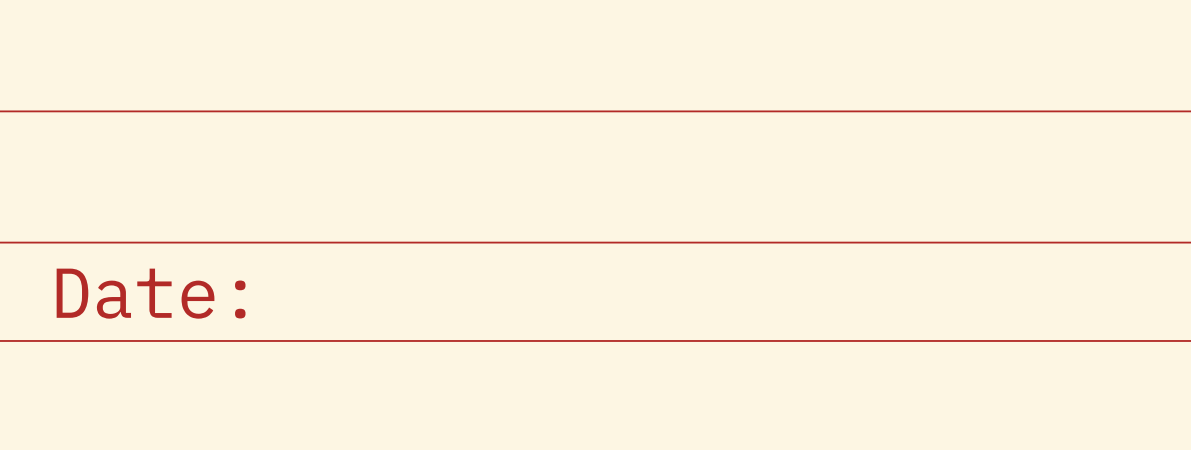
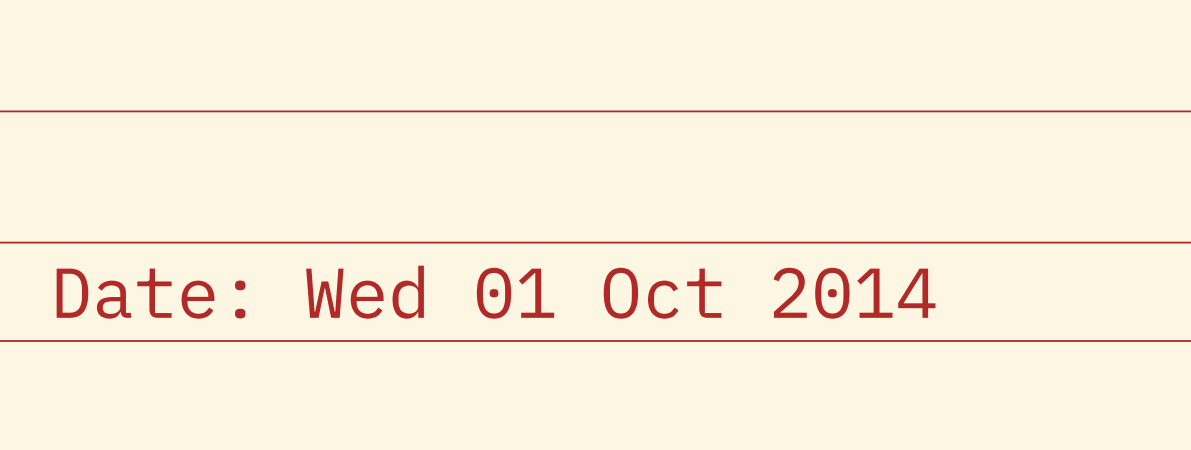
title block: Date: (151, 293) -> Date: Wed 01 Oct 2014 (496, 292)

